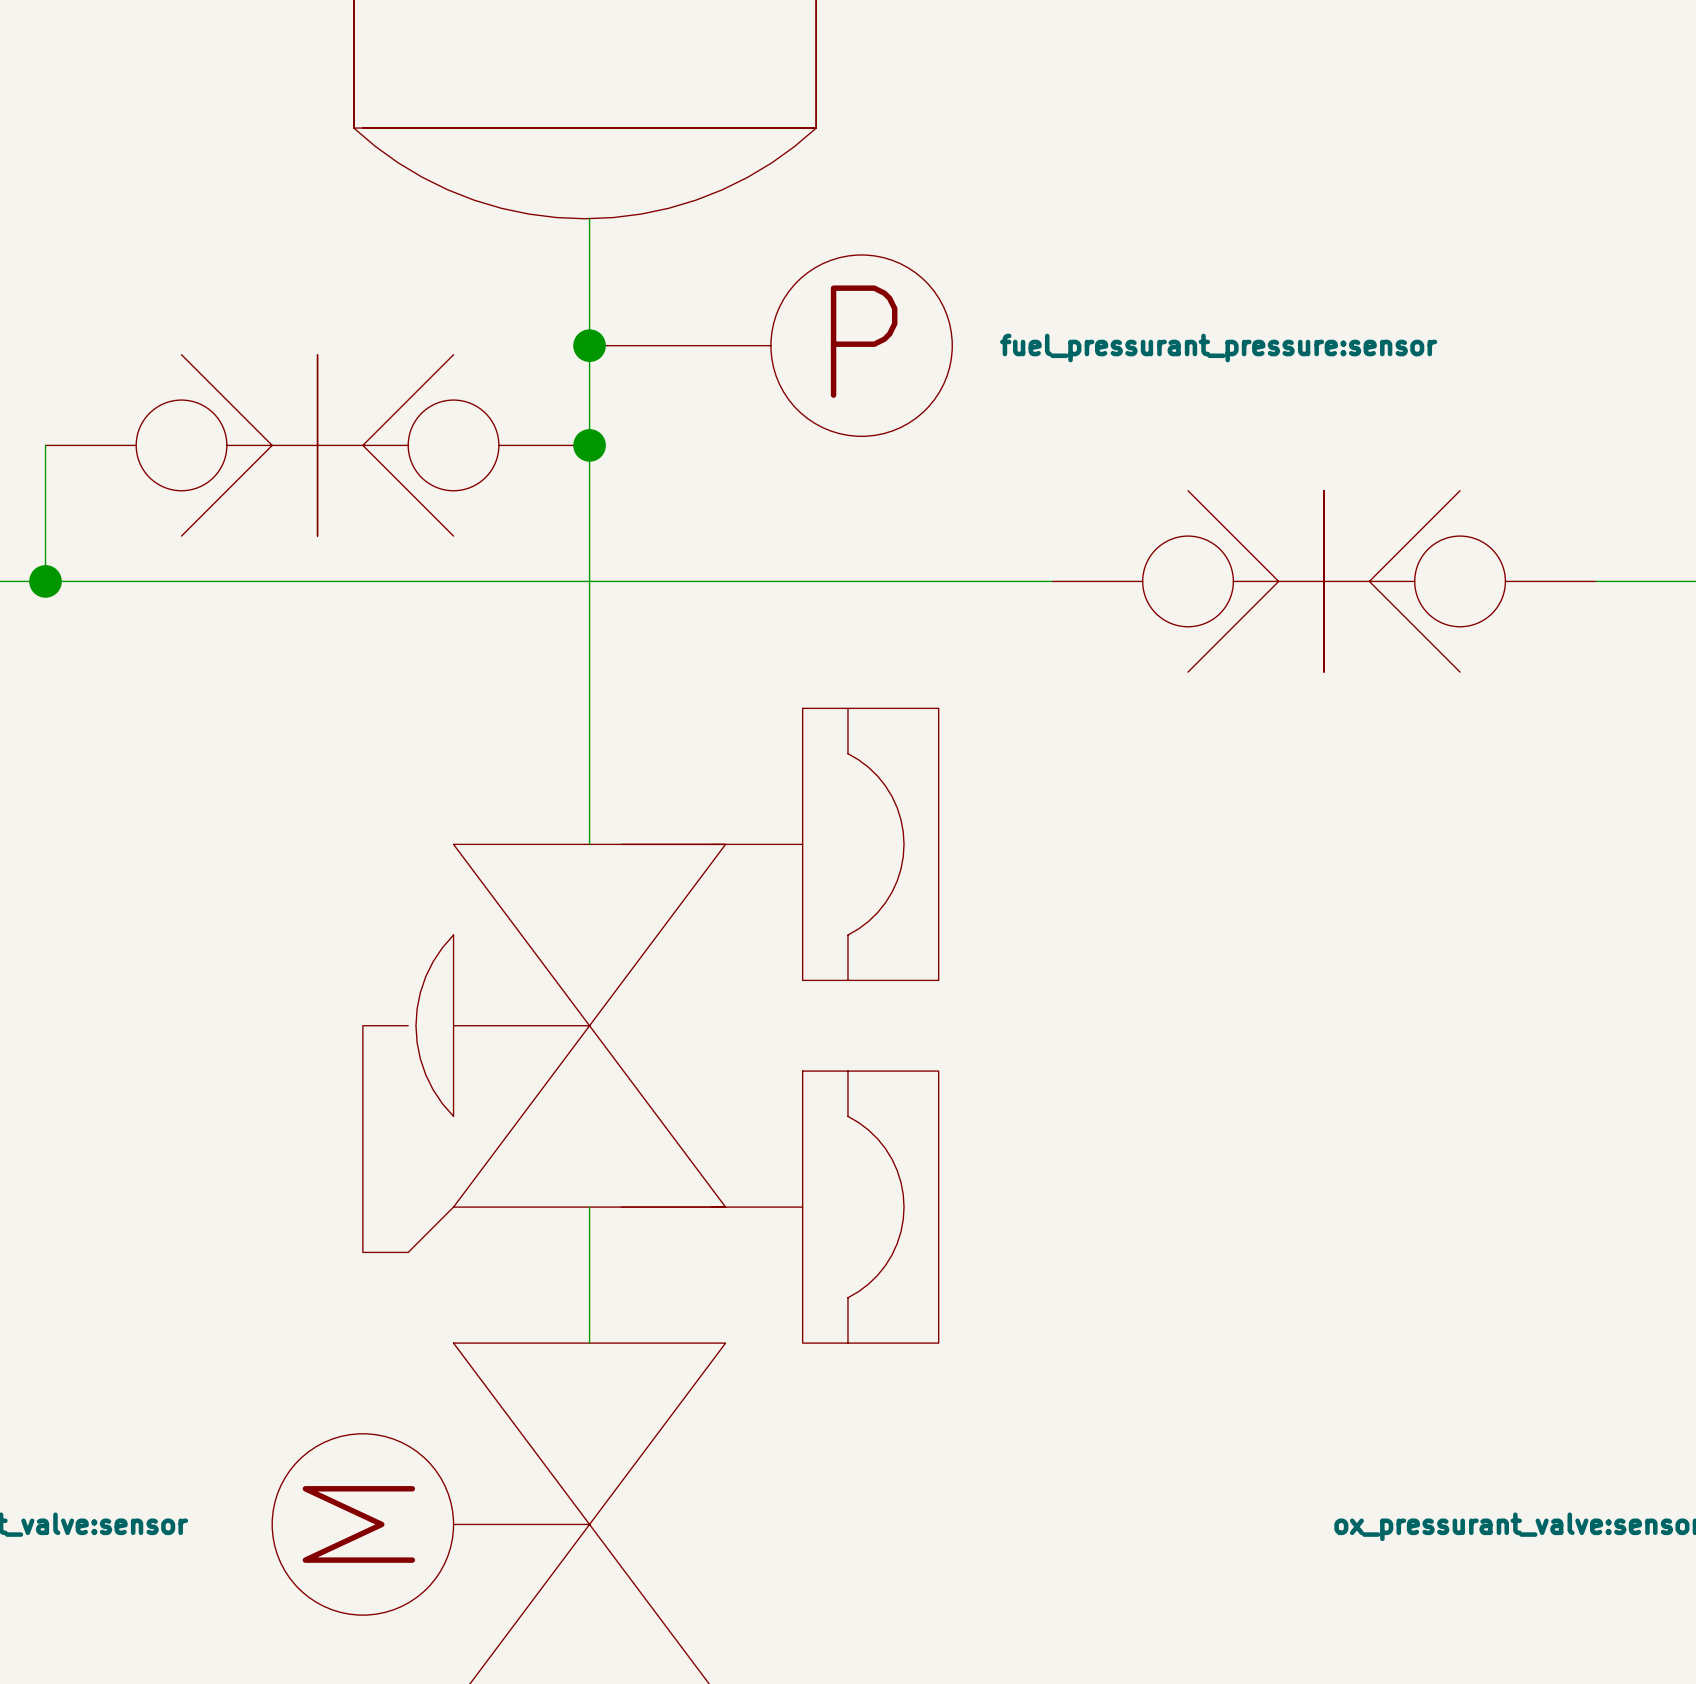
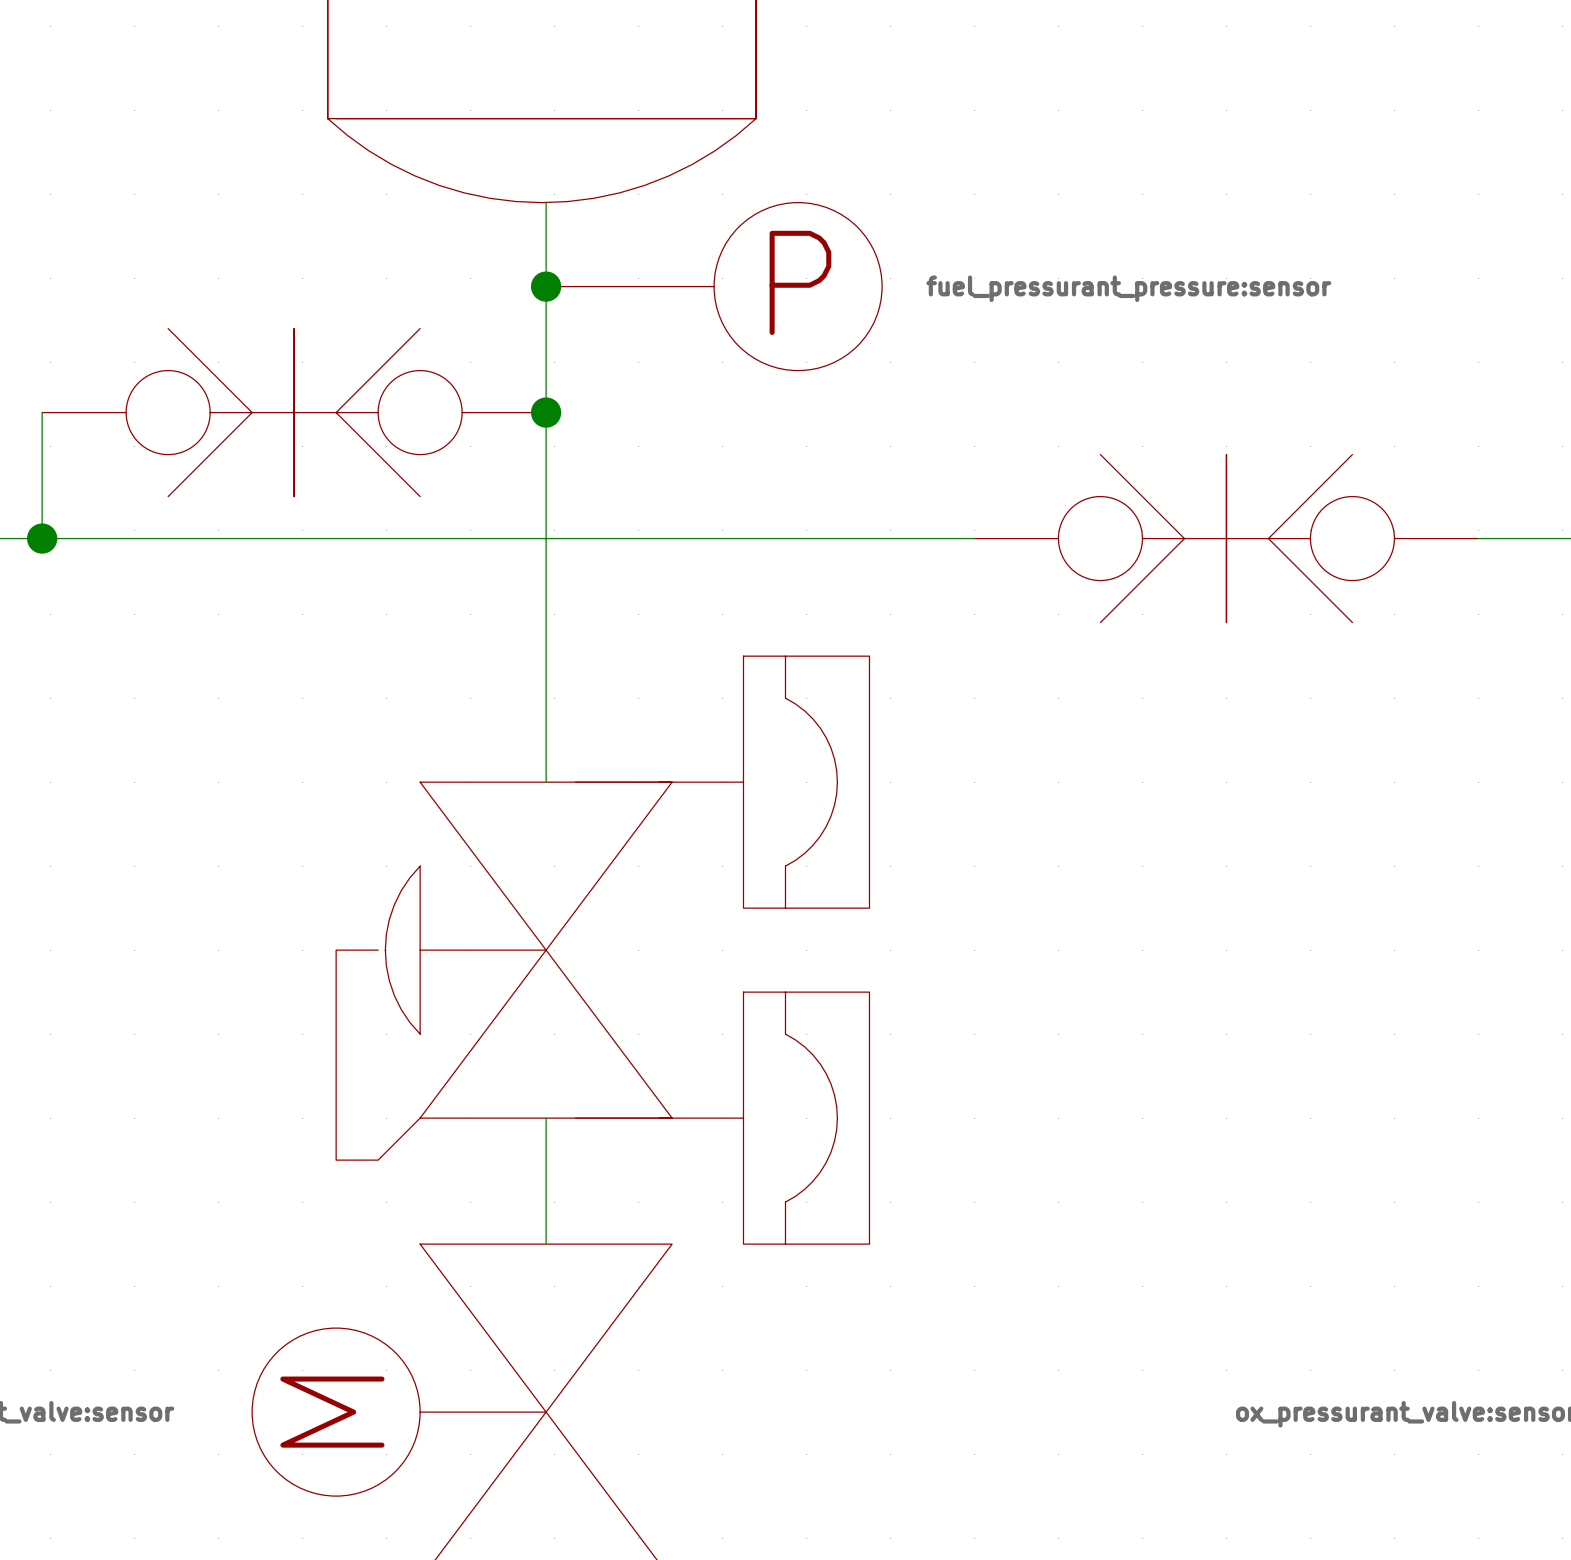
junction position: (589, 345) -> (546, 286)
part position: (770, 345) -> (714, 286)

